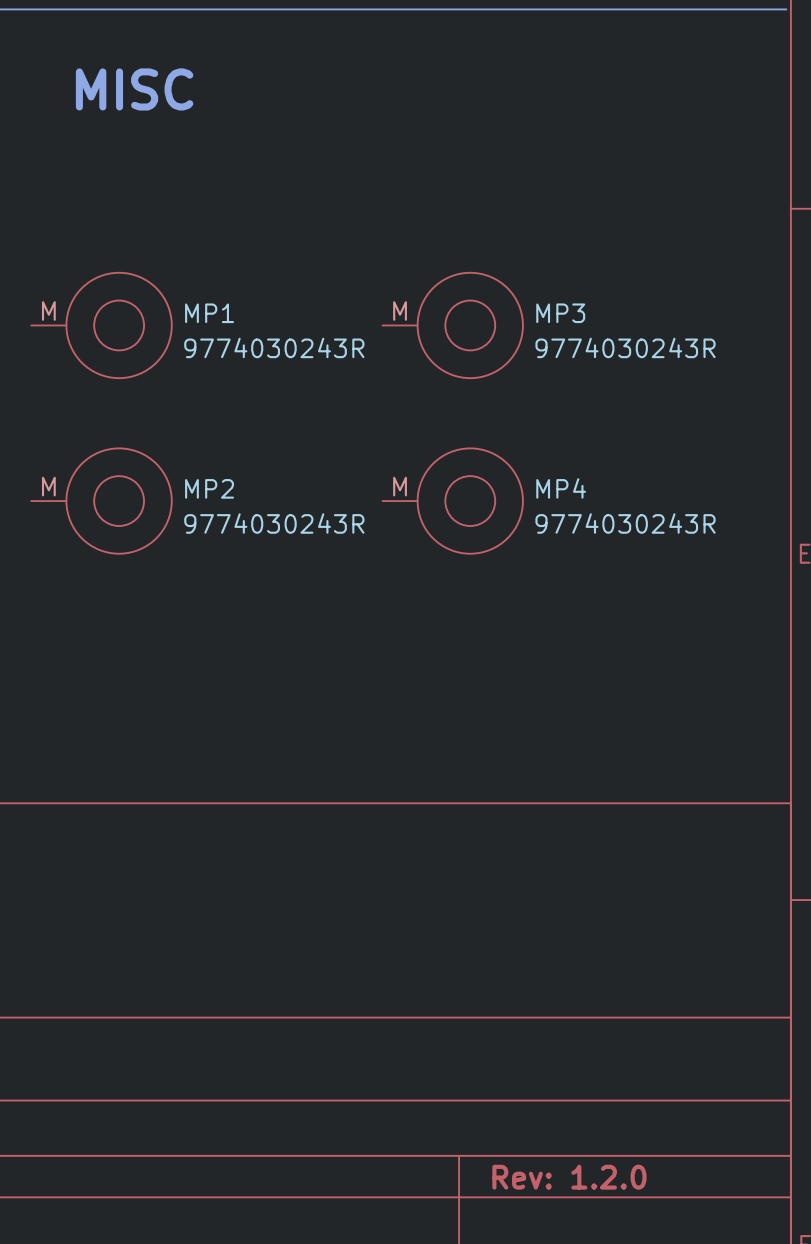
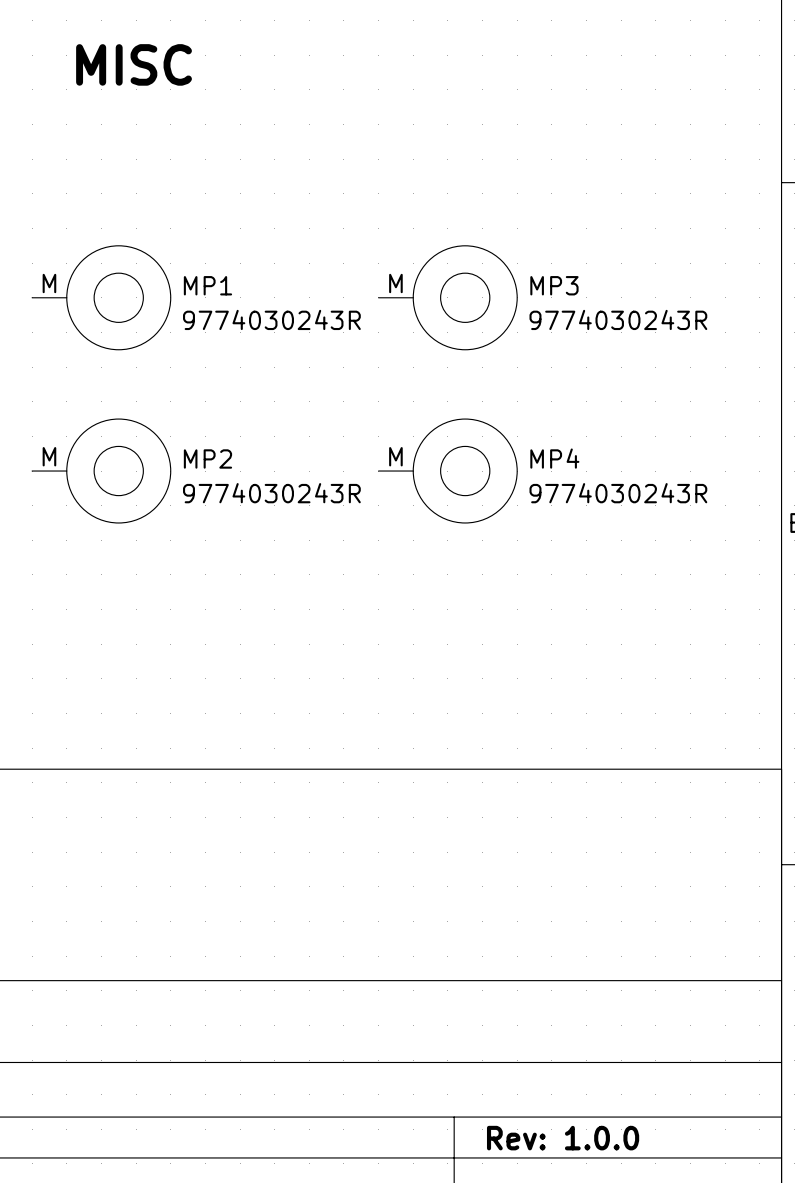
title block: Rev: 1.2.0 (569, 1177) -> Rev: 1.0.0 (563, 1138)

